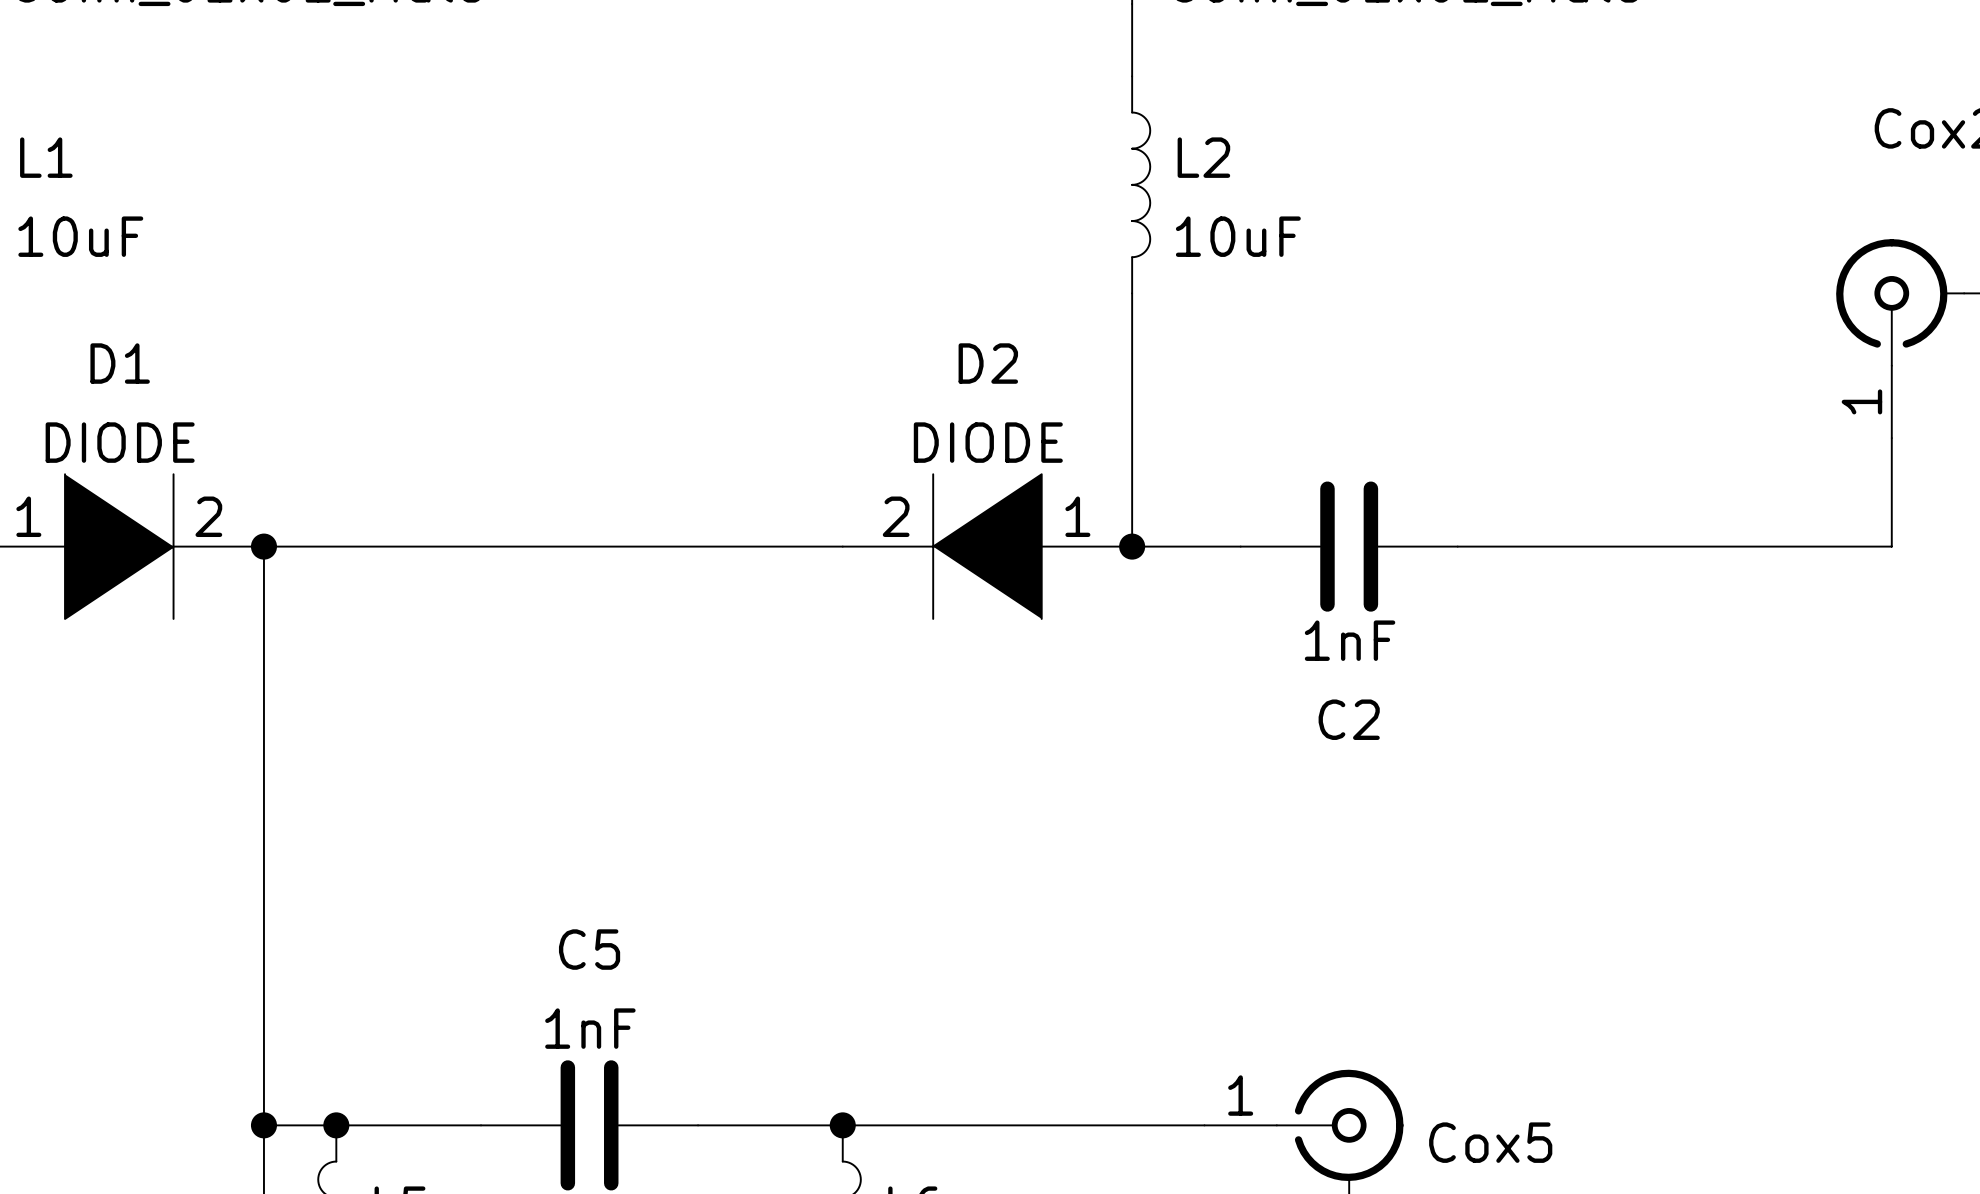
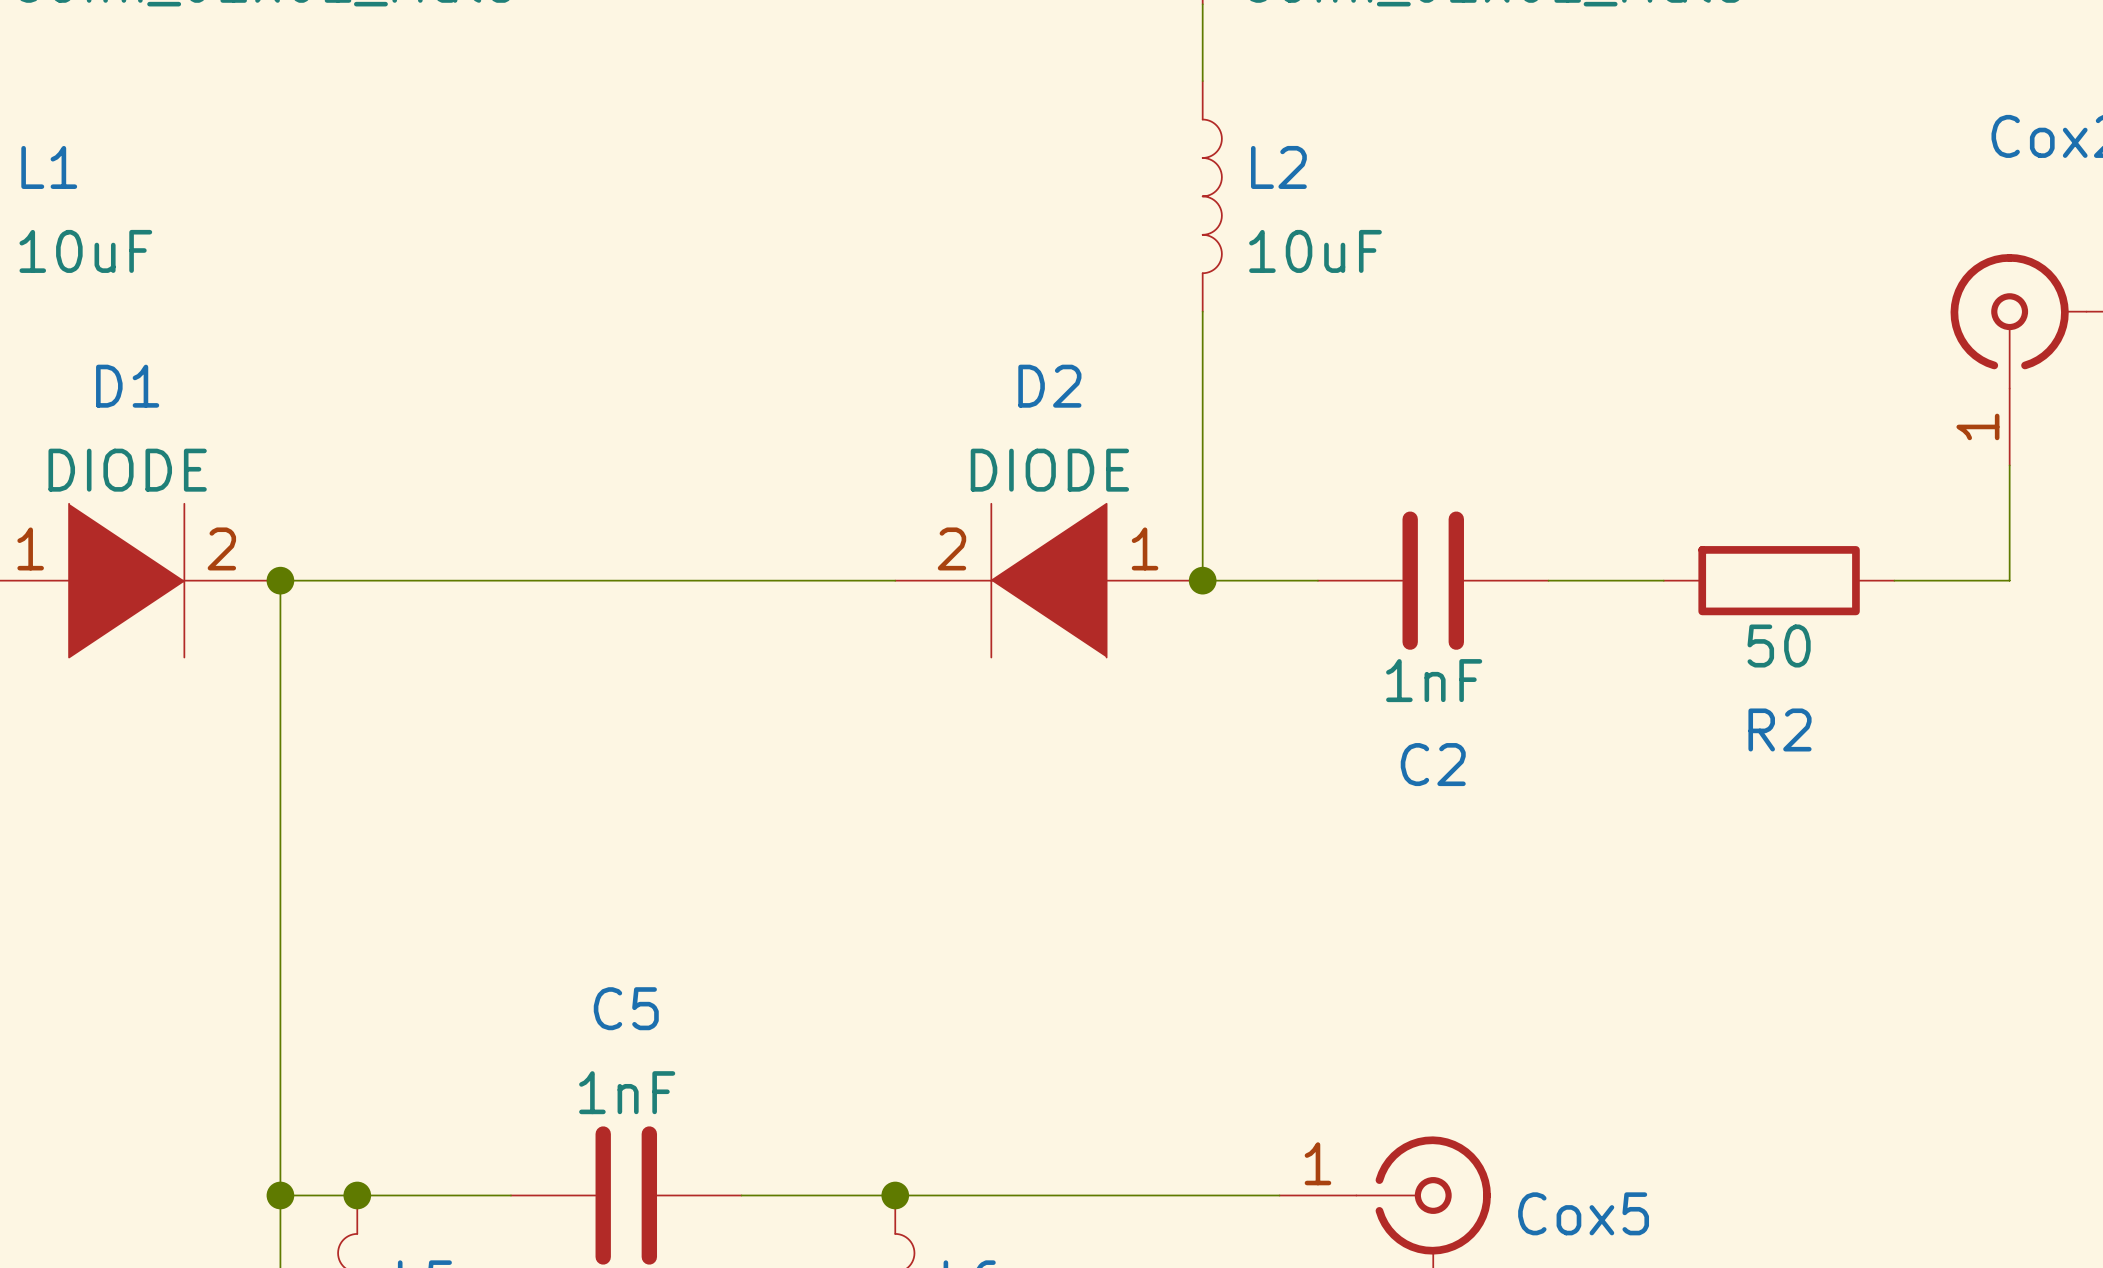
wire: (1566, 546) (1783, 546) -> none
R2: none -> 50 (1779, 580)

